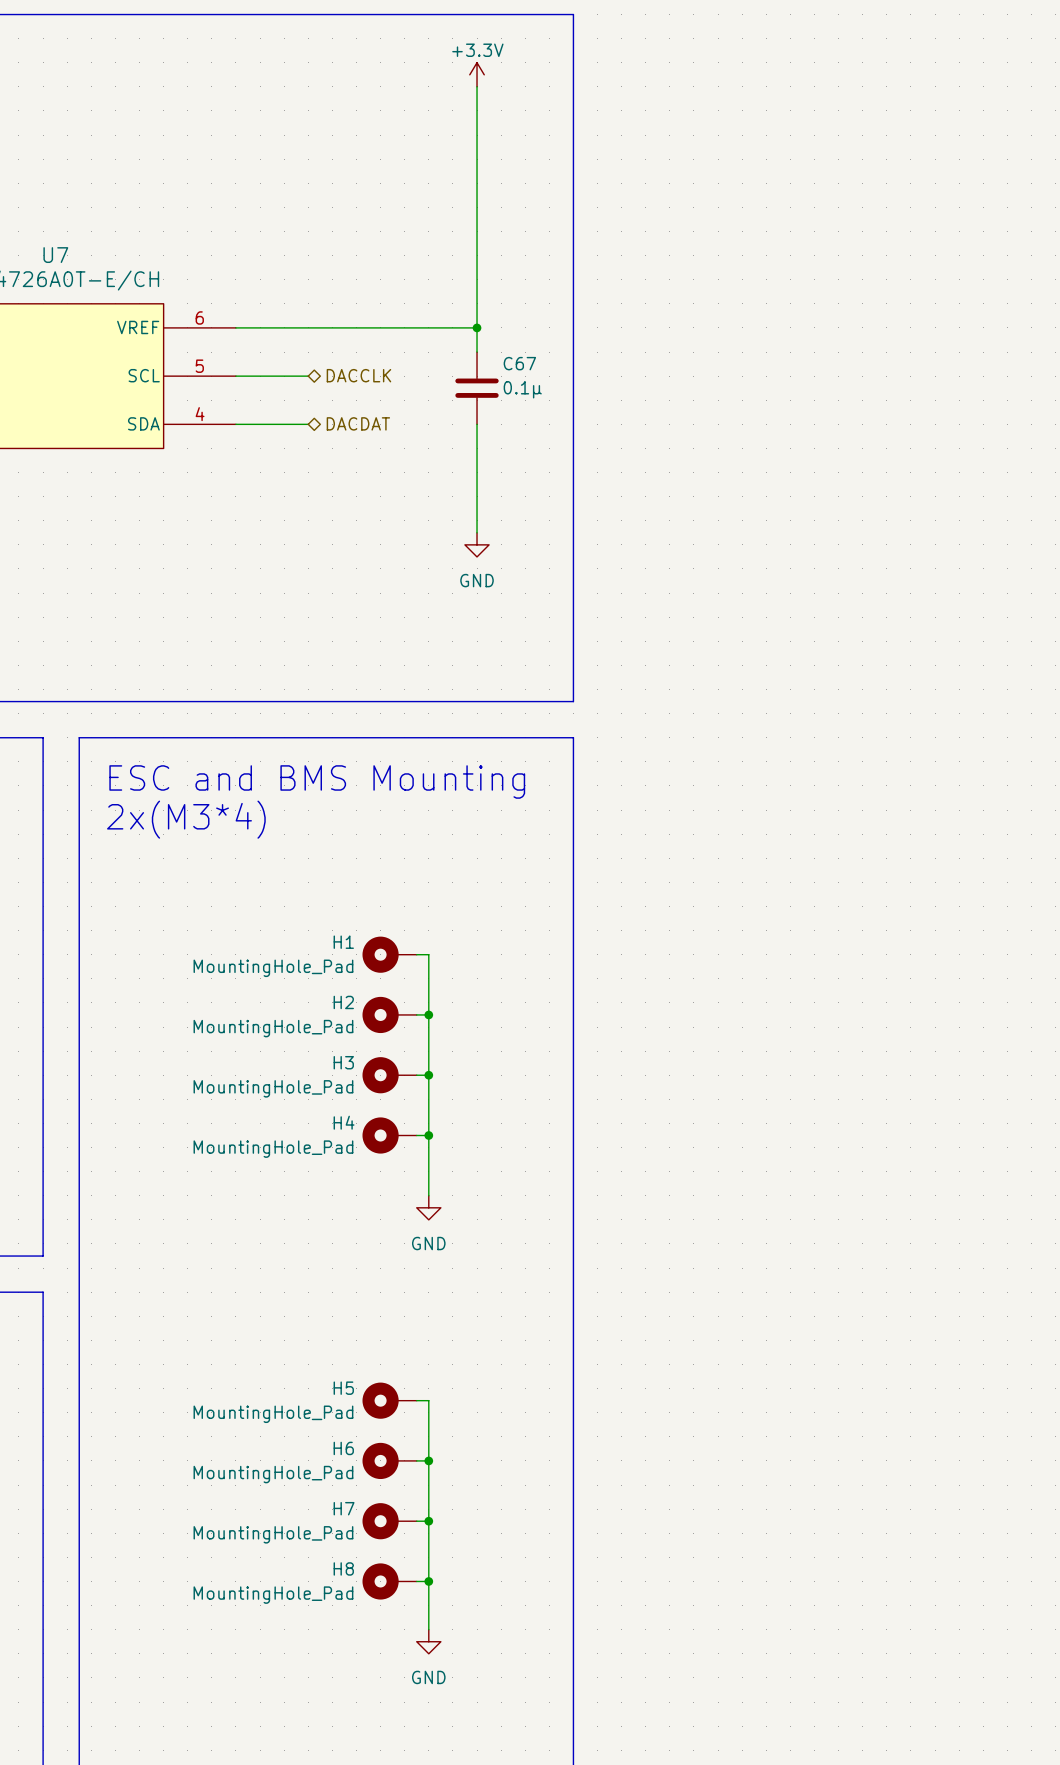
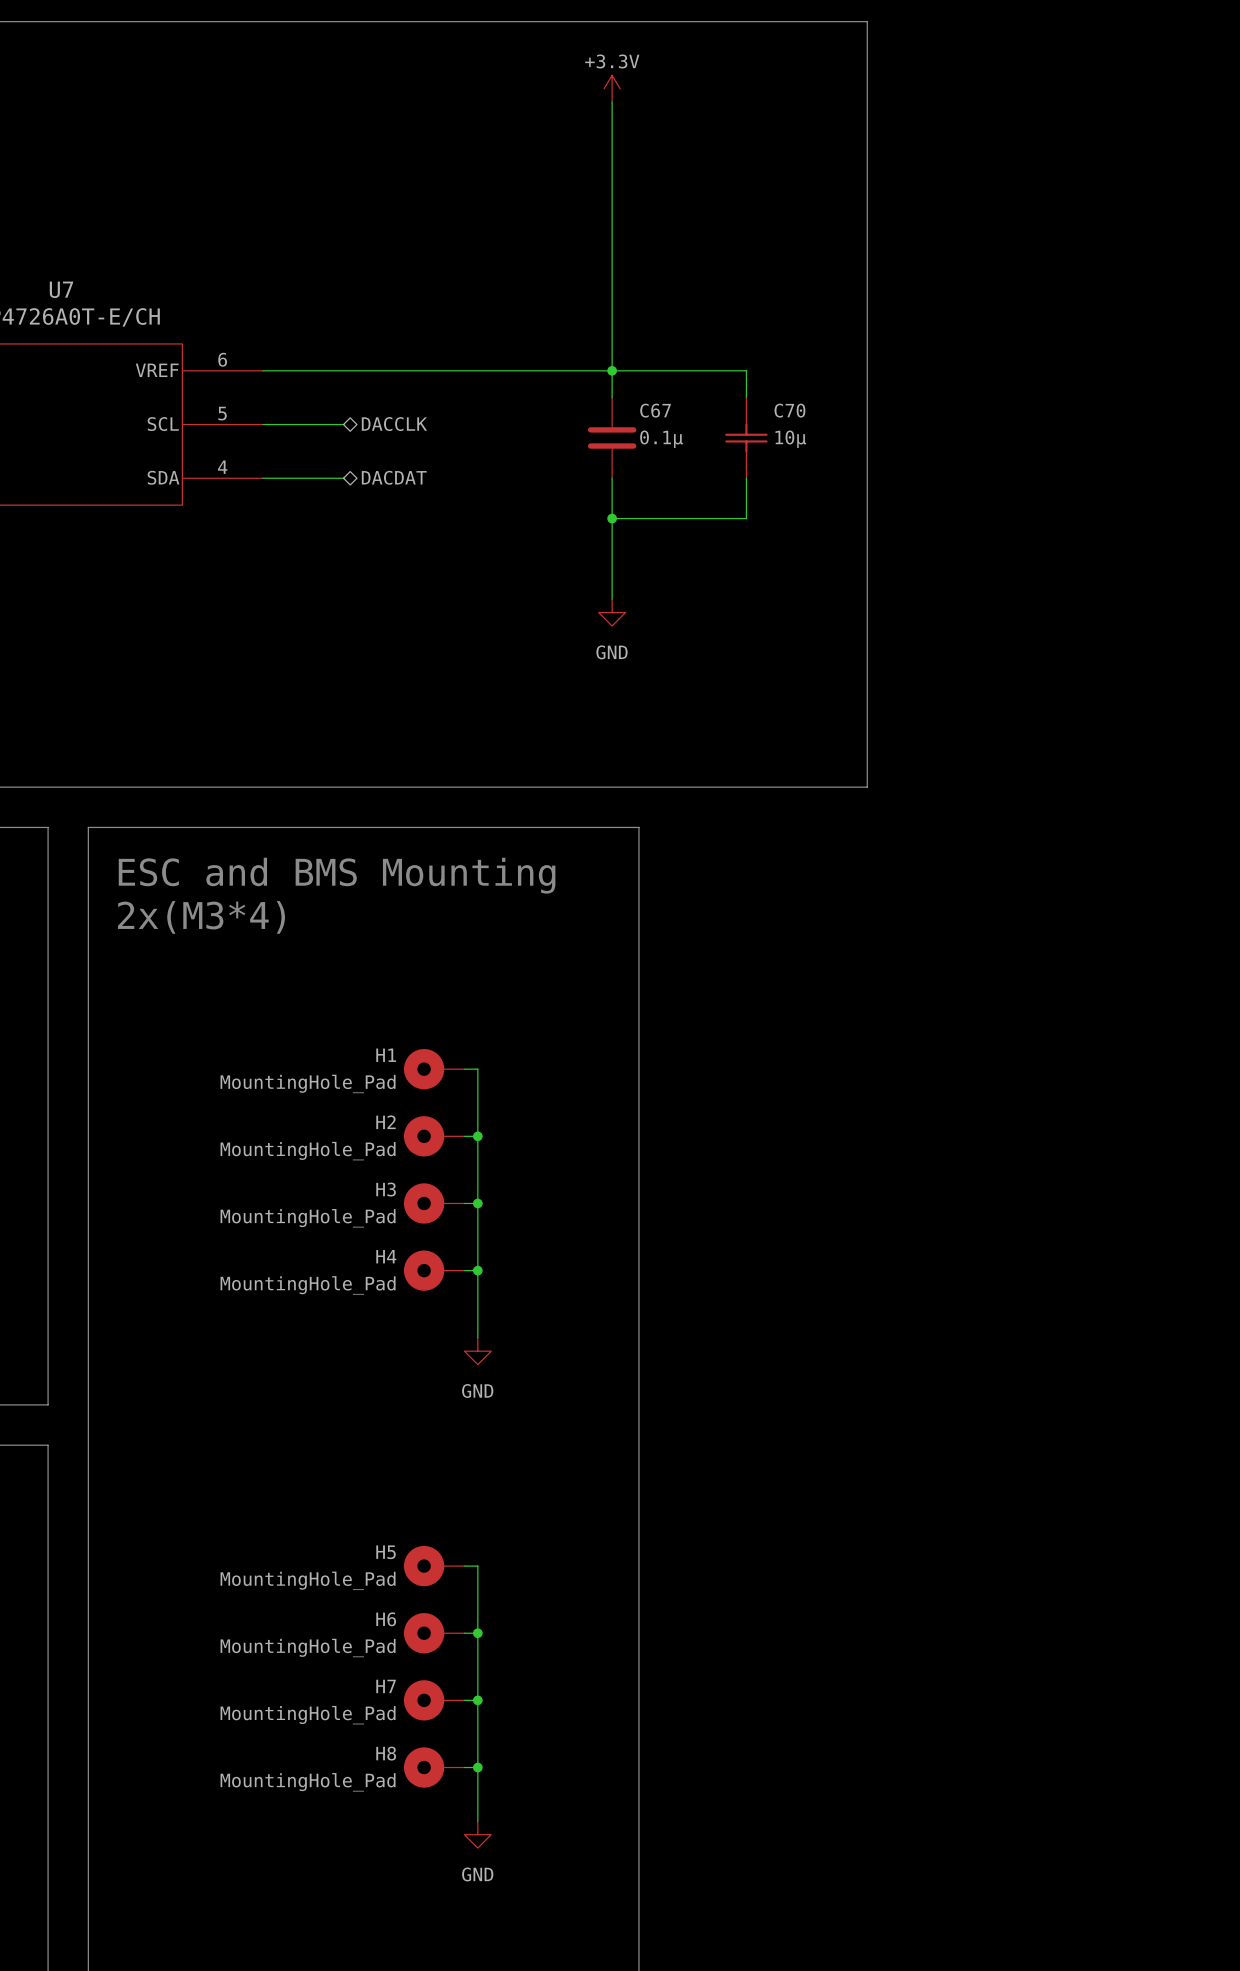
line: (573, 14) (573, 701) -> (638, 21) (867, 21) (867, 787) (638, 787)
power symbol position: +3.3V (477, 74) -> +3.3V (612, 88)
wire: (477, 86) (477, 352) -> (612, 102) (612, 397)
wire: none -> (531, 370) (746, 370) (746, 397)
junction: (477, 327) -> none
junction: none -> (612, 370)
C67 position: (477, 388) -> (612, 437)
C70: none -> 10µ (746, 437)
wire: (477, 424) (477, 532) -> (612, 478) (612, 599)
wire: none -> (746, 478) (746, 518) (612, 518)
junction: none -> (612, 518)
power symbol position: GND (477, 544) -> GND (612, 612)

